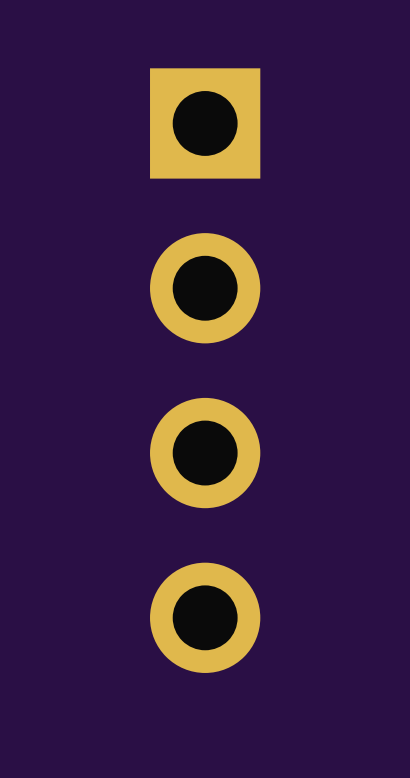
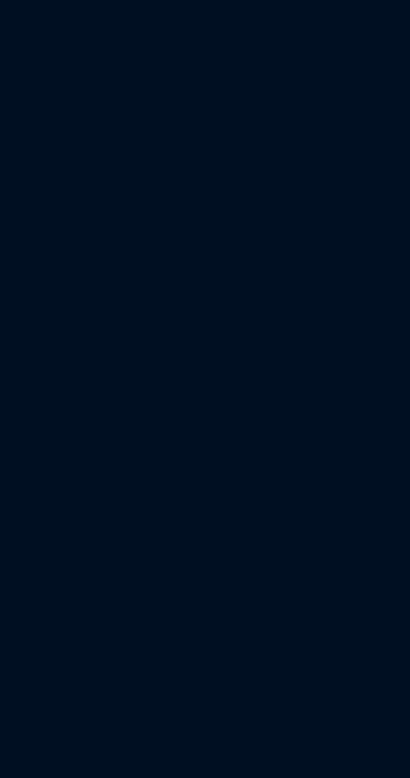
part: (205, 370) -> none

